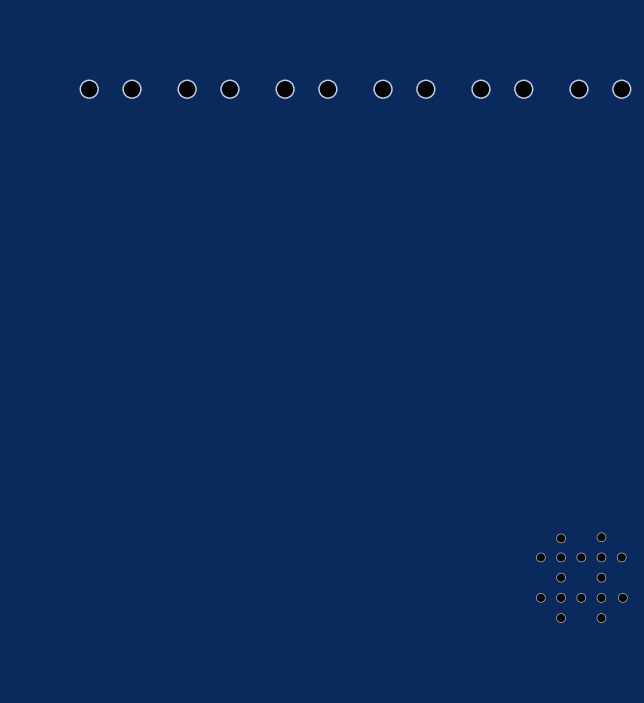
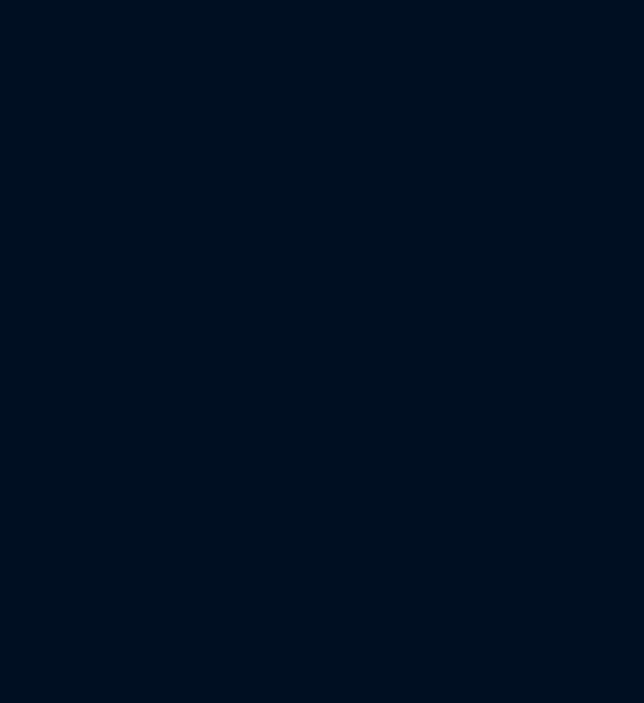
part: (110, 89) -> none
part: (208, 89) -> none
part: (306, 89) -> none
part: (404, 89) -> none
part: (502, 89) -> none
part: (600, 89) -> none
part: (581, 577) -> none

